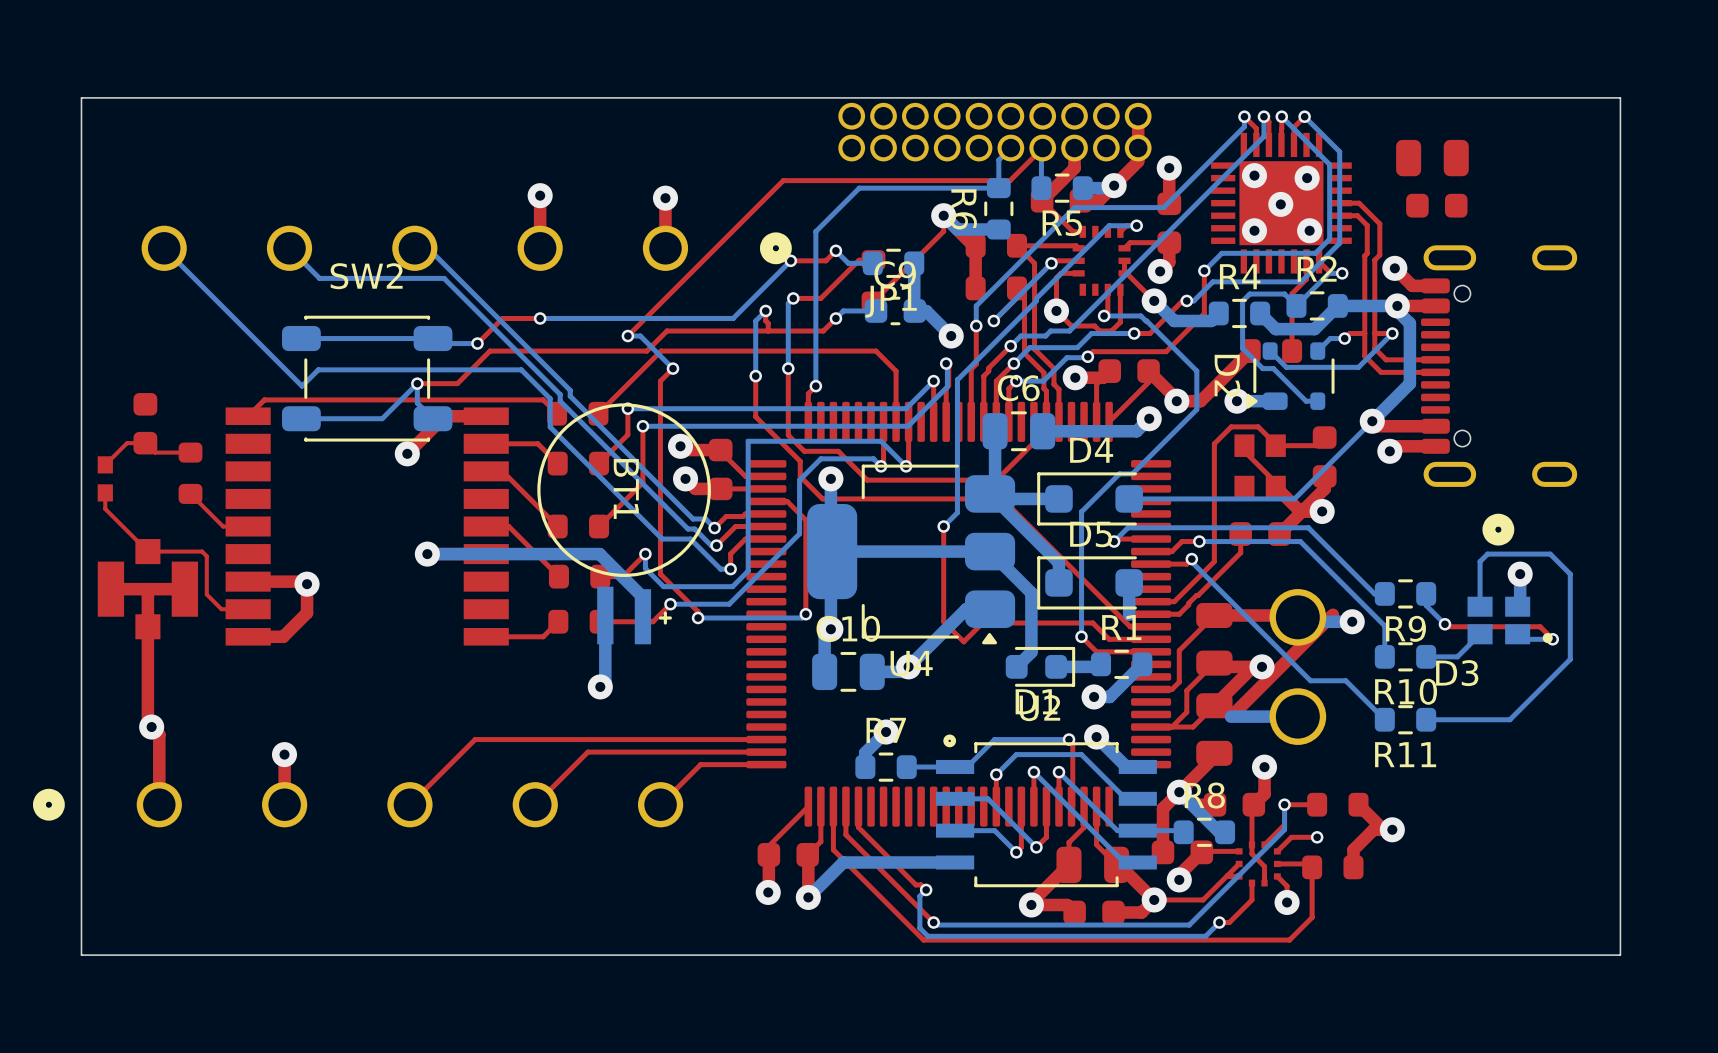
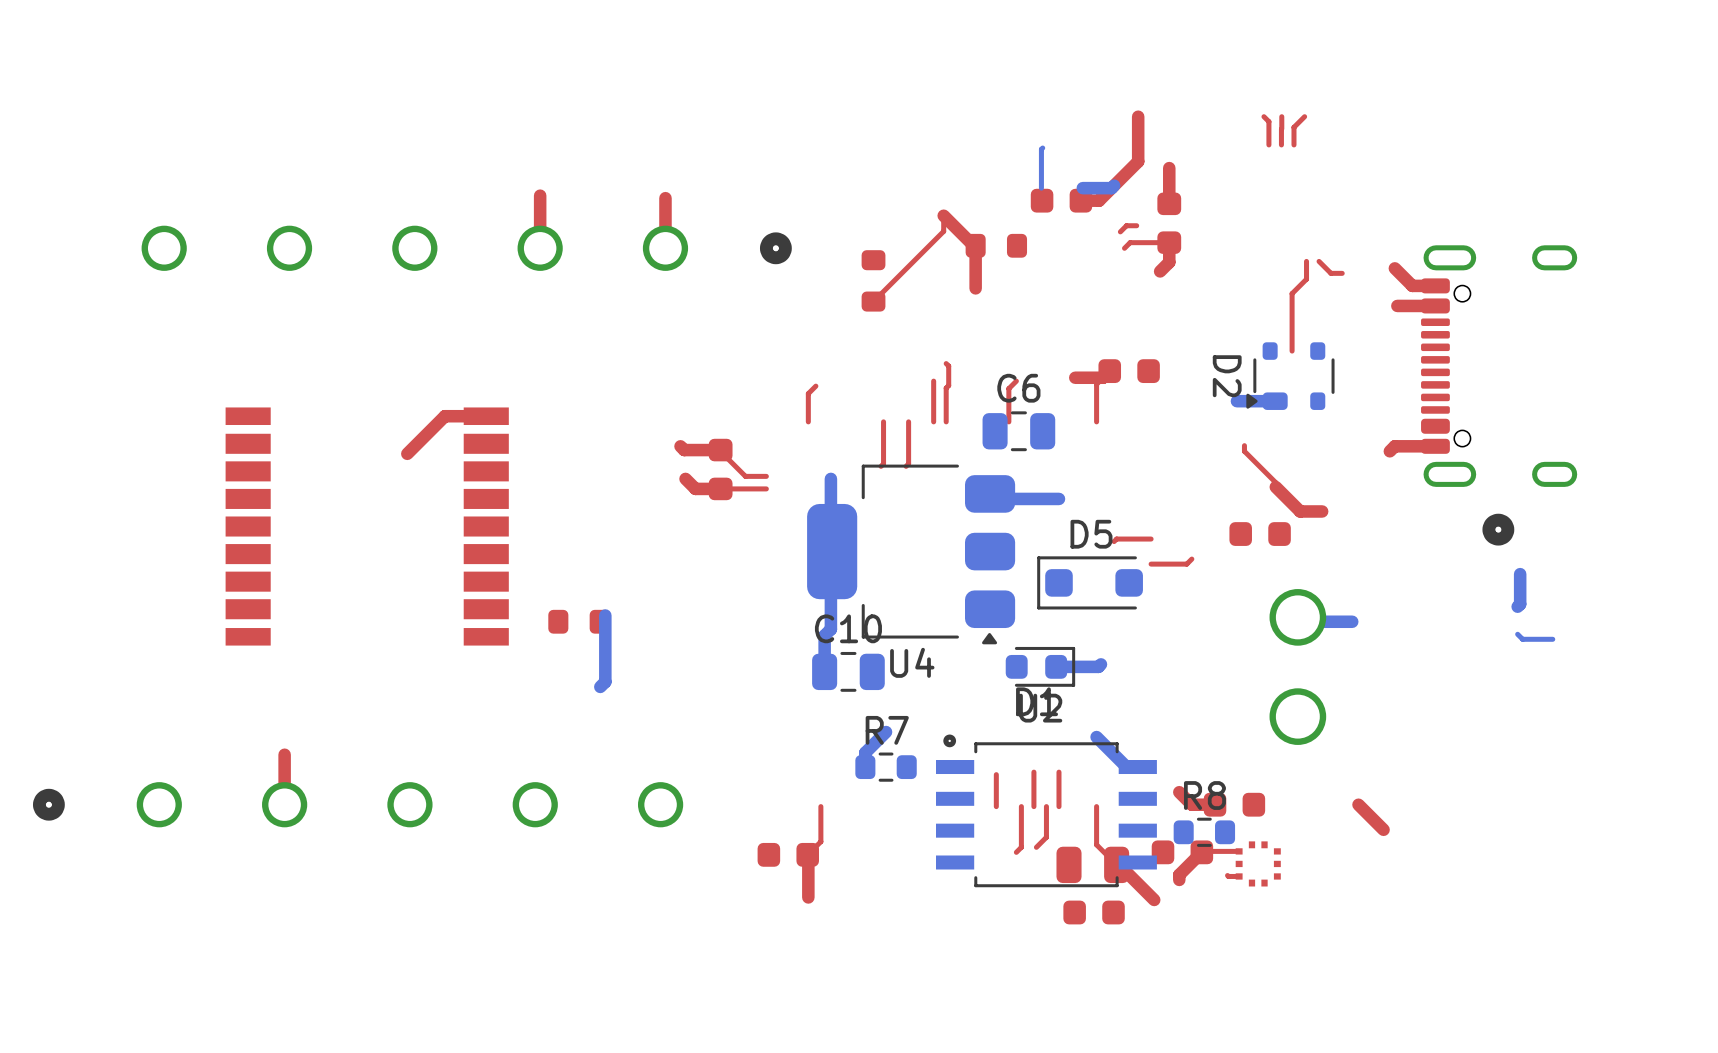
board edge: (1620, 97) (1620, 955) (81, 955) (81, 97) (1620, 97) -> none
top track: (1244, 116) (1256, 128) (1256, 144) -> none
bottom track: (1244, 116) (1244, 126) (1163, 207) (1074, 207) (976, 305) (976, 326) -> none
via: (1244, 116) -> none
bottom track: (1263, 116) (1263, 136) (1069, 331) (1050, 331) (1045, 336) (1020, 336) (1010, 346) -> none
via: (1263, 116) -> none
bottom track: (1281, 116) (1329, 164) (1329, 239) (1315, 253) (1221, 253) (1204, 270) -> none
via: (1281, 116) -> none
bottom track: (1304, 116) (1339, 151) (1339, 243) (1301, 281) (1212, 281) (1193, 300) (1186, 300) -> none
via: (1304, 116) -> none
part: (994, 132) -> none
bottom track: (1010, 148) (998, 160) (998, 188) (859, 188) (815, 231) (815, 386) -> none
top track: (1042, 148) (1010, 180) (783, 180) (627, 336) -> none
top track: (1074, 148) (1074, 168) (1042, 200) (1073, 231) (1082, 231) -> none
part: (1432, 158) -> none
via: (1169, 168) -> none
via: (1254, 175) -> none
via: (1307, 178) -> none
via: (1114, 185) -> none
R5: (1062, 188) -> none
via: (540, 195) -> none
via: (665, 198) -> none
part: (1281, 203) -> none
top track: (1339, 203) (1359, 203) (1379, 223) (1379, 255) (1374, 260) (1374, 348) (1386, 359) (1435, 359) -> none
via: (1280, 204) -> none
part: (1436, 205) -> none
R6: (998, 208) -> none
bottom track: (943, 215) (957, 229) (998, 229) -> none
via: (943, 215) -> none
top track: (1339, 215) (1357, 215) (1367, 225) (1367, 253) (1364, 255) (1364, 356) (1381, 372) (1435, 372) -> none
bottom track: (1136, 225) (1109, 225) (957, 379) (957, 512) (943, 526) -> none
via: (1136, 225) -> none
via: (1254, 230) -> none
via: (1309, 230) -> none
bottom track: (164, 248) (302, 386) (318, 369) (521, 369) (550, 398) (550, 427) (662, 539) (690, 539) (720, 569) (730, 569) -> none
bottom track: (289, 248) (319, 278) (444, 278) (560, 394) (560, 401) (688, 529) (694, 529) (711, 545) (716, 545) -> none
bottom track: (414, 248) (428, 248) (570, 390) (570, 396) (693, 518) (705, 518) (714, 528) -> none
top track: (1078, 248) (1076, 245) (1017, 245) (1034, 263) (1034, 349) (1053, 368) (1053, 384) (1058, 389) (1058, 421) -> none
top track: (835, 250) (825, 260) (790, 260) -> none
bottom track: (835, 250) (848, 263) (872, 263) -> none
via: (835, 250) -> none
bottom track: (790, 260) (733, 318) (540, 318) -> none
via: (790, 260) -> none
top track: (873, 260) (859, 260) (820, 298) (793, 298) -> none
top track: (1078, 260) (1053, 260) (1051, 263) -> none
part: (1101, 260) -> none
top track: (1124, 260) (1124, 273) (1154, 300) -> none
JP1: (893, 263) -> none
bottom track: (914, 263) (914, 310) (926, 310) (951, 336) -> none
bottom track: (1051, 263) (993, 320) -> none
via: (1051, 263) -> none
via: (1394, 268) -> none
top track: (1204, 270) (1204, 313) (1166, 351) (1092, 351) (1087, 356) -> none
via: (1204, 270) -> none
via: (1160, 271) -> none
top track: (1078, 273) (1060, 273) (1056, 277) (1056, 310) (1071, 326) (1094, 326) (1099, 331) (1111, 331) (1120, 322) (1120, 289) -> none
bottom track: (1342, 273) (1329, 273) (1296, 305) (1284, 294) (1249, 294) (1242, 301) (1242, 348) (1262, 368) (1273, 368) (1306, 401) (1317, 401) -> none
via: (1342, 273) -> none
part: (996, 288) -> none
top track: (1107, 289) (1107, 312) (1104, 315) -> none
bottom track: (793, 298) (788, 303) (788, 368) -> none
via: (793, 298) -> none
bottom track: (1154, 300) (1174, 320) (1211, 320) (1218, 313) -> none
via: (1154, 300) -> none
top track: (1186, 300) (1182, 300) (1150, 333) (1134, 333) -> none
via: (1186, 300) -> none
R2: (1317, 305) -> none
via: (1397, 305) -> none
top track: (765, 310) (768, 331) -> none
bottom track: (765, 310) (755, 320) (755, 376) -> none
via: (765, 310) -> none
bottom track: (876, 310) (843, 310) (835, 318) -> none
C9: (895, 310) -> none
via: (1056, 310) -> none
R4: (1239, 313) -> none
bottom track: (1260, 313) (1275, 329) (1314, 329) (1337, 305) (1397, 305) (1397, 310) (1409, 323) (1409, 383) (1294, 498) (1129, 498) -> none
bottom track: (1104, 315) (1140, 315) (1196, 371) (1196, 409) (1132, 473) (1119, 473) (1081, 511) (1081, 636) -> none
via: (1104, 315) -> none
top track: (540, 318) (502, 318) (477, 343) -> none
via: (540, 318) -> none
top track: (835, 318) (823, 331) (666, 331) (646, 351) (490, 351) (457, 383) (417, 383) -> none
via: (835, 318) -> none
top track: (993, 320) (1017, 297) (1017, 288) (1024, 295) (1024, 353) (1043, 372) (1043, 388) (1046, 391) (1046, 421) -> none
via: (993, 320) -> none
top track: (976, 326) (976, 364) (971, 369) (971, 421) -> none
via: (976, 326) -> none
bottom track: (1134, 333) (1091, 333) (1077, 347) (1029, 347) (1013, 363) -> none
via: (1134, 333) -> none
top track: (1364, 333) (1349, 333) (1344, 338) -> none
top track: (1392, 333) (1374, 333) -> none
bottom track: (1392, 333) (1358, 367) (1286, 367) (1270, 351) -> none
via: (1392, 333) -> none
bottom track: (627, 336) (640, 336) (673, 368) -> none
via: (627, 336) -> none
via: (951, 336) -> none
bottom track: (301, 338) (433, 338) (438, 343) (477, 343) -> none
bottom track: (1344, 338) (1330, 338) (1317, 351) -> none
via: (1344, 338) -> none
via: (477, 343) -> none
top track: (1010, 346) (988, 368) (988, 371) (983, 376) (983, 421) -> none
via: (1010, 346) -> none
top track: (1250, 351) (1200, 401) (1176, 401) (1148, 371) (1148, 382) (1109, 421) -> none
part: (1271, 351) -> none
bottom track: (1087, 356) (1066, 357) (1043, 381) (1016, 381) -> none
via: (1087, 356) -> none
bottom track: (946, 363) (947, 386) (908, 426) (642, 426) -> none
via: (946, 363) -> none
top track: (1013, 363) (996, 381) (996, 421) -> none
via: (1013, 363) -> none
top track: (673, 368) (660, 381) (660, 574) (698, 611) (698, 617) -> none
via: (673, 368) -> none
top track: (788, 368) (788, 435) (804, 451) (838, 451) (867, 480) (996, 480) (1033, 442) (1033, 421) -> none
via: (788, 368) -> none
top track: (755, 376) (755, 416) (800, 461) (800, 476) (822, 498) (1002, 498) (1130, 626) (1151, 626) -> none
via: (755, 376) -> none
via: (1075, 377) -> none
SW2: (367, 378) -> none
bottom track: (933, 381) (906, 408) (627, 408) -> none
via: (933, 381) -> none
via: (1016, 381) -> none
via: (417, 383) -> none
via: (815, 386) -> none
via: (1176, 401) -> none
via: (1236, 401) -> none
top track: (627, 408) (627, 434) (599, 463) -> none
via: (627, 408) -> none
top track: (557, 413) (543, 399) (264, 399) (248, 416) -> none
part: (577, 413) -> none
top track: (598, 413) (661, 351) (876, 351) (896, 371) (896, 421) -> none
bottom track: (433, 418) (417, 403) (417, 383) (382, 418) (301, 418) -> none
bottom track: (1149, 418) (1136, 431) (1042, 431) -> none
via: (1149, 418) -> none
top track: (1372, 421) (1377, 426) (1435, 426) -> none
via: (1372, 421) -> none
part: (145, 423) -> none
top track: (642, 426) (642, 482) (599, 526) -> none
via: (642, 426) -> none
bottom track: (995, 431) (995, 488) (990, 493) (1058, 562) (1058, 582) -> none
top track: (1324, 437) (1316, 445) (1275, 445) (1258, 426) (1231, 426) (1214, 443) (1214, 561) (1174, 601) (1151, 601) -> none
top track: (486, 443) (537, 443) (557, 463) -> none
via: (680, 446) -> none
via: (1389, 451) -> none
top track: (190, 452) (154, 452) (145, 443) (127, 443) (105, 464) -> none
via: (407, 453) -> none
part: (1324, 456) -> none
part: (578, 463) -> none
bottom track: (881, 466) (873, 458) (820, 458) (799, 480) (799, 533) (729, 604) (670, 604) -> none
via: (881, 466) -> none
bottom track: (906, 466) (881, 441) (748, 441) (748, 571) (732, 586) (663, 586) (645, 568) (645, 554) -> none
via: (906, 466) -> none
part: (1260, 466) -> none
top track: (486, 471) (502, 471) (557, 526) -> none
part: (190, 473) -> none
top track: (1324, 476) (1324, 488) (1279, 534) -> none
part: (105, 478) -> none
via: (685, 478) -> none
via: (830, 478) -> none
top track: (105, 492) (105, 508) (147, 551) (202, 551) (206, 556) (206, 594) (221, 609) (248, 609) -> none
top track: (190, 493) (223, 526) (248, 526) -> none
D4: (1090, 498) -> none
top track: (766, 501) (787, 501) (805, 520) (805, 614) -> none
via: (1322, 511) -> none
top track: (766, 513) (726, 516) (714, 528) -> none
BT1: (624, 523) -> none
top track: (486, 526) (508, 526) (558, 576) -> none
part: (578, 526) -> none
top track: (766, 526) (735, 526) (716, 545) -> none
top track: (943, 526) (943, 621) (963, 641) (982, 623) (1092, 623) (1109, 639) (1151, 639) -> none
via: (943, 526) -> none
via: (714, 528) -> none
top track: (1240, 534) (1240, 552) (1179, 614) (1151, 614) -> none
top track: (766, 539) (745, 539) (730, 553) (730, 569) -> none
bottom track: (1114, 541) (1127, 527) (1308, 527) (1374, 593) (1384, 593) -> none
via: (1114, 541) -> none
top track: (1199, 541) (1181, 541) (1171, 551) (1151, 551) -> none
bottom track: (1199, 541) (1300, 541) (1384, 625) (1384, 656) -> none
via: (1199, 541) -> none
via: (716, 545) -> none
bottom track: (832, 551) (990, 551) (1031, 592) (1031, 652) (1016, 666) -> none
bottom track: (427, 554) (599, 554) (642, 597) (642, 616) -> none
via: (427, 554) -> none
top track: (645, 554) (622, 576) (600, 576) -> none
via: (645, 554) -> none
bottom track: (1191, 559) (1191, 562) (1310, 680) (1345, 680) (1384, 719) -> none
via: (1191, 559) -> none
via: (730, 569) -> none
via: (1520, 574) -> none
part: (579, 576) -> none
top track: (248, 581) (304, 581) (307, 584) (307, 612) (283, 636) (241, 636) -> none
bottom track: (1129, 582) (1129, 614) -> none
via: (307, 584) -> none
top track: (146, 589) (147, 723) (159, 734) (159, 804) -> none
part: (147, 589) -> none
top track: (184, 589) (110, 589) -> none
R9: (1405, 593) -> none
bottom track: (1426, 593) (1426, 605) (1444, 624) -> none
top track: (670, 604) (652, 621) (599, 621) -> none
via: (670, 604) -> none
bottom track: (1480, 606) (1480, 561) (1487, 554) (1550, 554) (1570, 574) (1570, 659) (1509, 719) (1426, 719) -> none
bottom track: (990, 609) (966, 609) (903, 671) (872, 671) -> none
bottom track: (805, 614) (802, 617) (698, 617) -> none
via: (805, 614) -> none
part: (958, 614) -> none
top track: (1332, 614) (1231, 716) -> none
via: (698, 617) -> none
top track: (1297, 617) (1295, 615) (1214, 615) (1179, 650) (1179, 682) (1171, 689) (1151, 689) -> none
D3: (1510, 620) -> none
top track: (558, 621) (543, 636) (486, 636) -> none
via: (1352, 621) -> none
top track: (1444, 624) (1447, 626) (1540, 626) (1552, 639) -> none
via: (1444, 624) -> none
via: (830, 629) -> none
bottom track: (1480, 634) (1457, 656) (1426, 656) -> none
top track: (1081, 636) (1096, 651) (1151, 651) -> none
via: (1081, 636) -> none
part: (1214, 639) -> none
via: (1552, 639) -> none
R10: (1405, 656) -> none
R1: (1121, 664) -> none
bottom track: (1142, 664) (1109, 696) (1094, 696) -> none
via: (908, 666) -> none
top track: (1253, 666) (1193, 727) (1151, 727) -> none
top track: (1262, 666) (1218, 666) (1214, 663) (1186, 690) (1186, 712) (1171, 727) -> none
via: (1262, 666) -> none
via: (600, 686) -> none
via: (1094, 696) -> none
bottom track: (1297, 716) (1231, 716) -> none
R11: (1405, 719) -> none
via: (151, 727) -> none
part: (1214, 729) -> none
via: (886, 732) -> none
via: (1096, 737) -> none
top track: (766, 739) (475, 739) (409, 804) -> none
top track: (1069, 739) (1072, 743) (1071, 806) -> none
bottom track: (1069, 739) (994, 739) (967, 767) (906, 767) -> none
via: (1069, 739) -> none
top track: (766, 752) (587, 752) (535, 804) -> none
top track: (1214, 753) (1214, 757) (1163, 808) (1163, 852) -> none
via: (284, 754) -> none
top track: (766, 764) (700, 764) (660, 804) -> none
top track: (1264, 767) (1264, 794) (1251, 806) (1251, 853) (1264, 866) (1264, 883) -> none
via: (1264, 767) -> none
bottom track: (1033, 772) (1124, 862) (1137, 862) -> none
via: (1033, 772) -> none
bottom track: (1058, 772) (1117, 830) (1182, 830) (1183, 832) -> none
via: (1058, 772) -> none
bottom track: (996, 774) (1016, 754) (1081, 754) (1125, 798) (1137, 798) -> none
via: (996, 774) -> none
bottom track: (1179, 792) (1219, 832) (1225, 832) -> none
via: (1179, 792) -> none
bottom track: (955, 798) (987, 798) (1036, 847) -> none
bottom track: (1284, 804) (1284, 829) (1189, 925) (936, 925) (933, 922) -> none
via: (1284, 804) -> none
top track: (1317, 804) (1284, 804) (1284, 824) (1264, 844) -> none
part: (1337, 804) -> none
top track: (808, 806) (768, 846) (768, 892) -> none
top track: (833, 806) (833, 849) (923, 940) (1289, 940) (1312, 917) (1312, 867) (1308, 863) (1277, 863) -> none
top track: (845, 806) (845, 834) (933, 922) -> none
top track: (858, 806) (858, 827) (915, 884) (921, 884) (926, 889) -> none
top track: (1084, 806) (1084, 827) (1069, 842) (1069, 864) (1031, 902) (1031, 904) (1067, 904) (1074, 912) -> none
top track: (1392, 829) (1373, 829) (1353, 849) (1353, 867) -> none
via: (1392, 829) -> none
bottom track: (955, 830) (994, 830) (1016, 852) -> none
top track: (1317, 837) (1291, 837) (1277, 851) -> none
via: (1317, 837) -> none
via: (1036, 847) -> none
via: (1016, 852) -> none
bottom track: (955, 862) (843, 862) (808, 897) -> none
top track: (1239, 863) (1203, 899) (1154, 899) (1141, 912) (1113, 912) -> none
part: (1332, 867) -> none
top track: (1277, 876) (1287, 886) (1287, 902) -> none
via: (1179, 879) -> none
top track: (1251, 883) (1251, 899) (1229, 922) (1219, 922) -> none
bottom track: (926, 889) (919, 896) (919, 928) (927, 936) (1205, 936) (1219, 922) -> none
via: (926, 889) -> none
via: (768, 892) -> none
via: (808, 897) -> none
via: (1154, 899) -> none
via: (1287, 902) -> none
via: (1031, 904) -> none
via: (933, 922) -> none
via: (1219, 922) -> none

